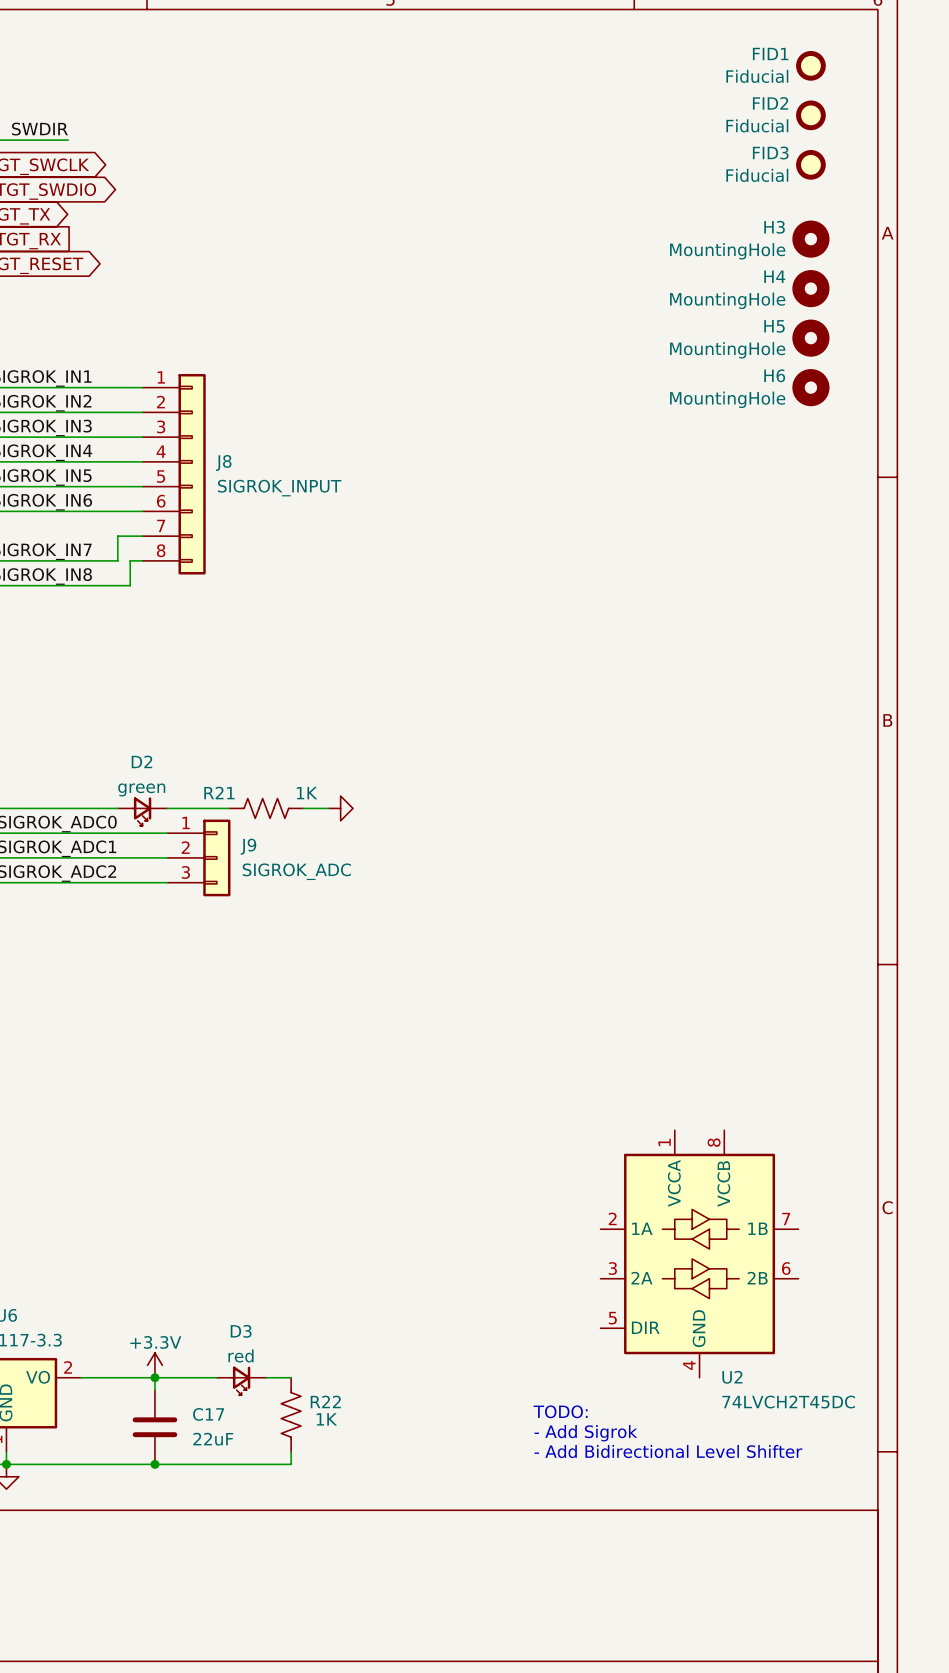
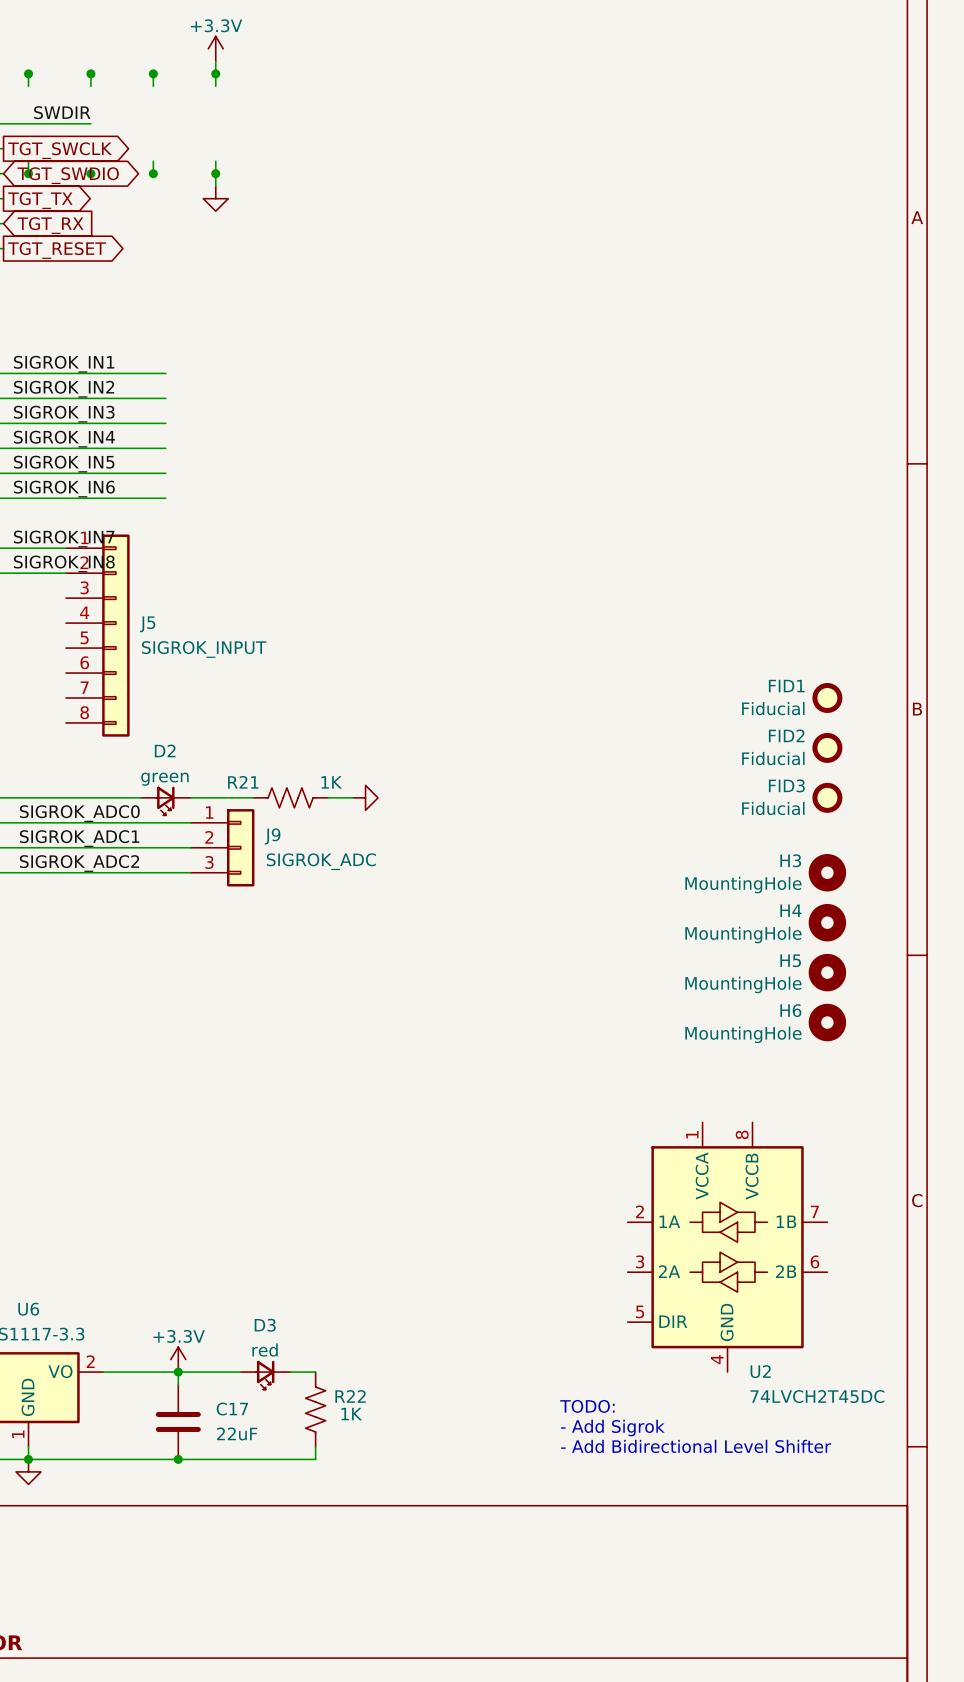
power symbol: none -> +3.3V (215, 48)
FID1 position: (810, 65) -> (827, 697)
wire: none -> (215, 61) (215, 86)
wire: none -> (28, 73) (28, 86)
junction: none -> (28, 73)
wire: none -> (90, 73) (90, 86)
junction: none -> (90, 73)
wire: none -> (153, 73) (153, 86)
junction: none -> (153, 73)
junction: none -> (215, 73)
FID2 position: (810, 115) -> (827, 747)
FID3 position: (810, 164) -> (827, 797)
wire: none -> (28, 161) (28, 173)
wire: none -> (153, 161) (153, 173)
wire: none -> (215, 161) (215, 186)
junction: none -> (28, 173)
junction: none -> (90, 173)
junction: none -> (153, 173)
junction: none -> (215, 173)
power symbol: none -> (215, 198)
H3 position: (810, 239) -> (827, 872)
H4 position: (810, 288) -> (827, 922)
H5 position: (810, 338) -> (827, 972)
H6 position: (810, 387) -> (827, 1022)
J8: SIGROK_INPUT (174, 474) -> none
wire: (142, 536) (117, 536) (117, 560) (43, 560) -> none
wire: (142, 560) (130, 560) (130, 585) (43, 585) -> none
J5: none -> SIGROK_INPUT (97, 635)

